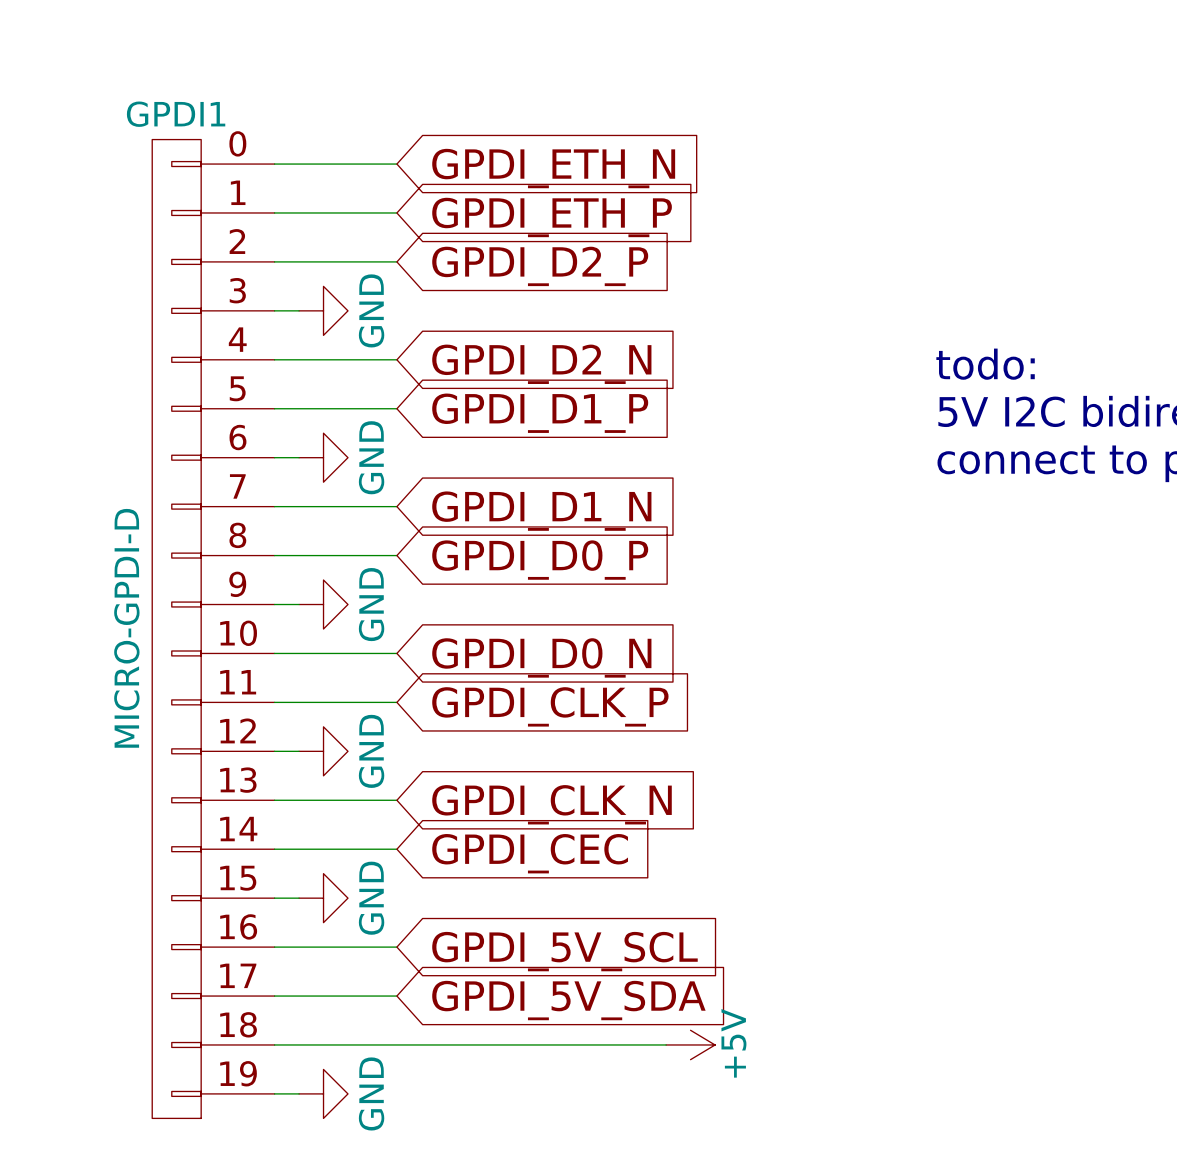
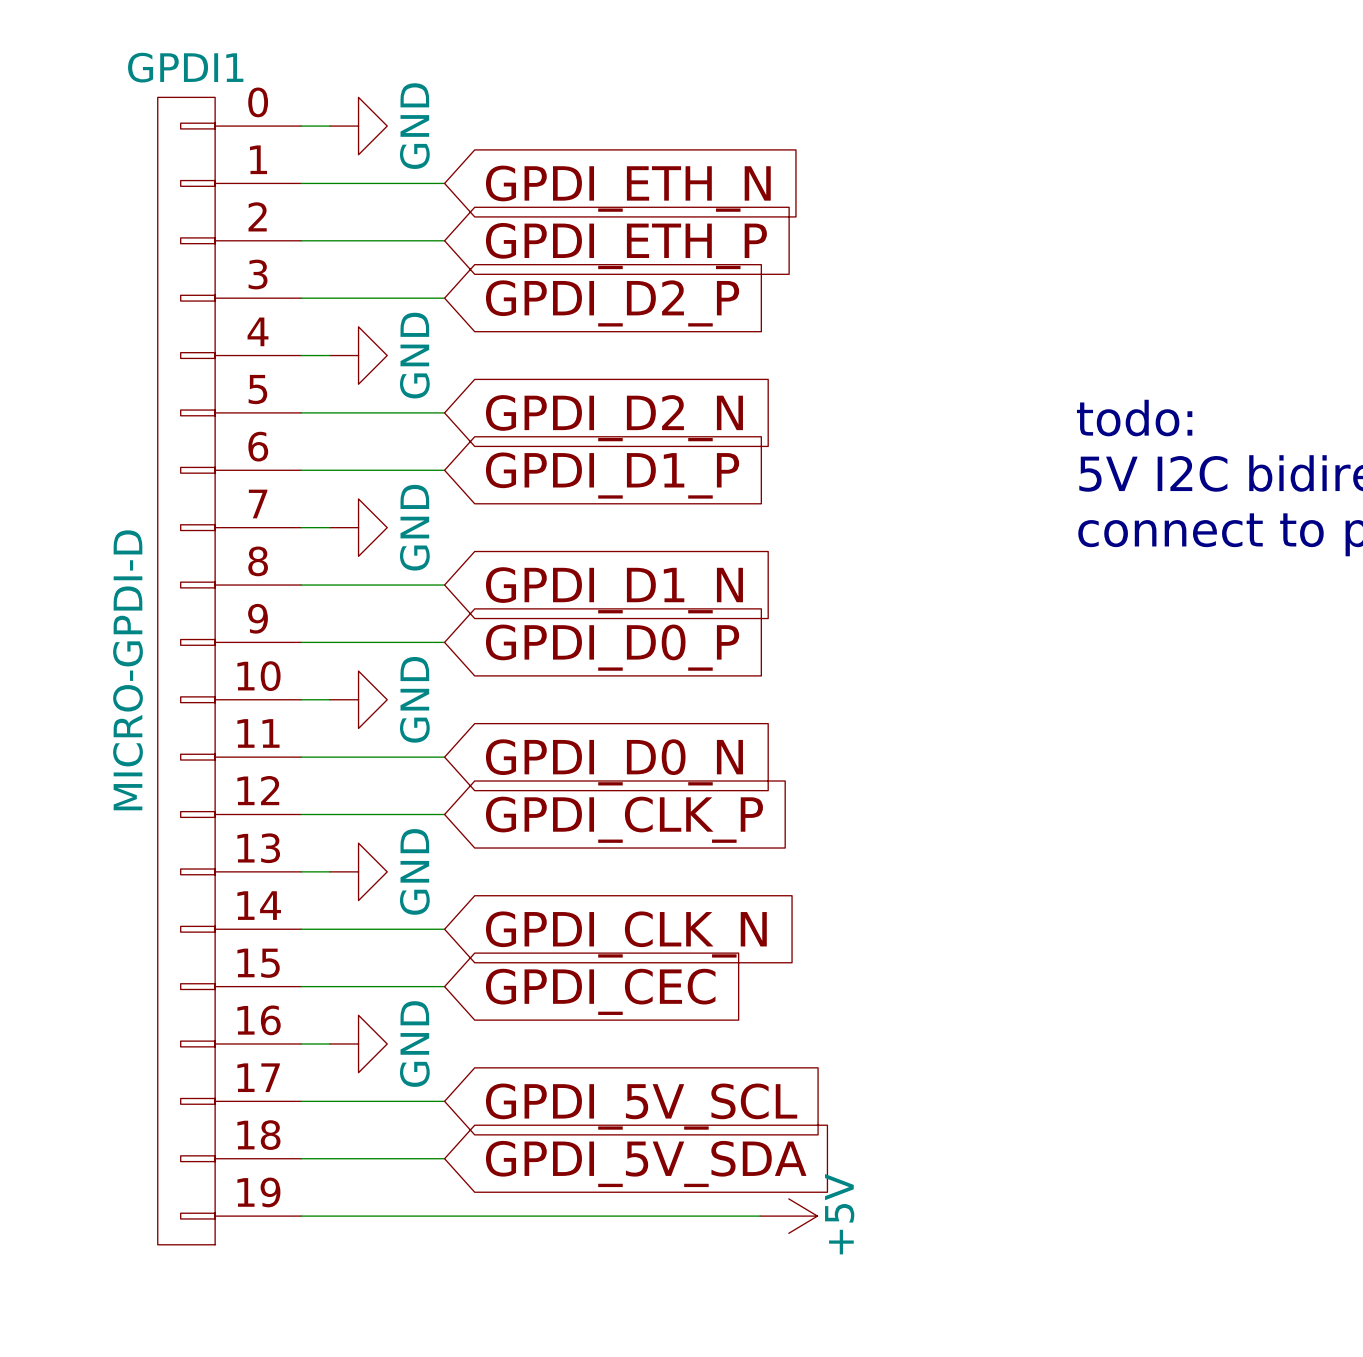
wire: none -> (301, 126) (329, 126)
power symbol: none -> GND (358, 126)
GPDI1 position: (213, 628) -> (229, 671)
wire: (274, 1093) (299, 1093) -> none
power symbol: GND (323, 1093) -> none

